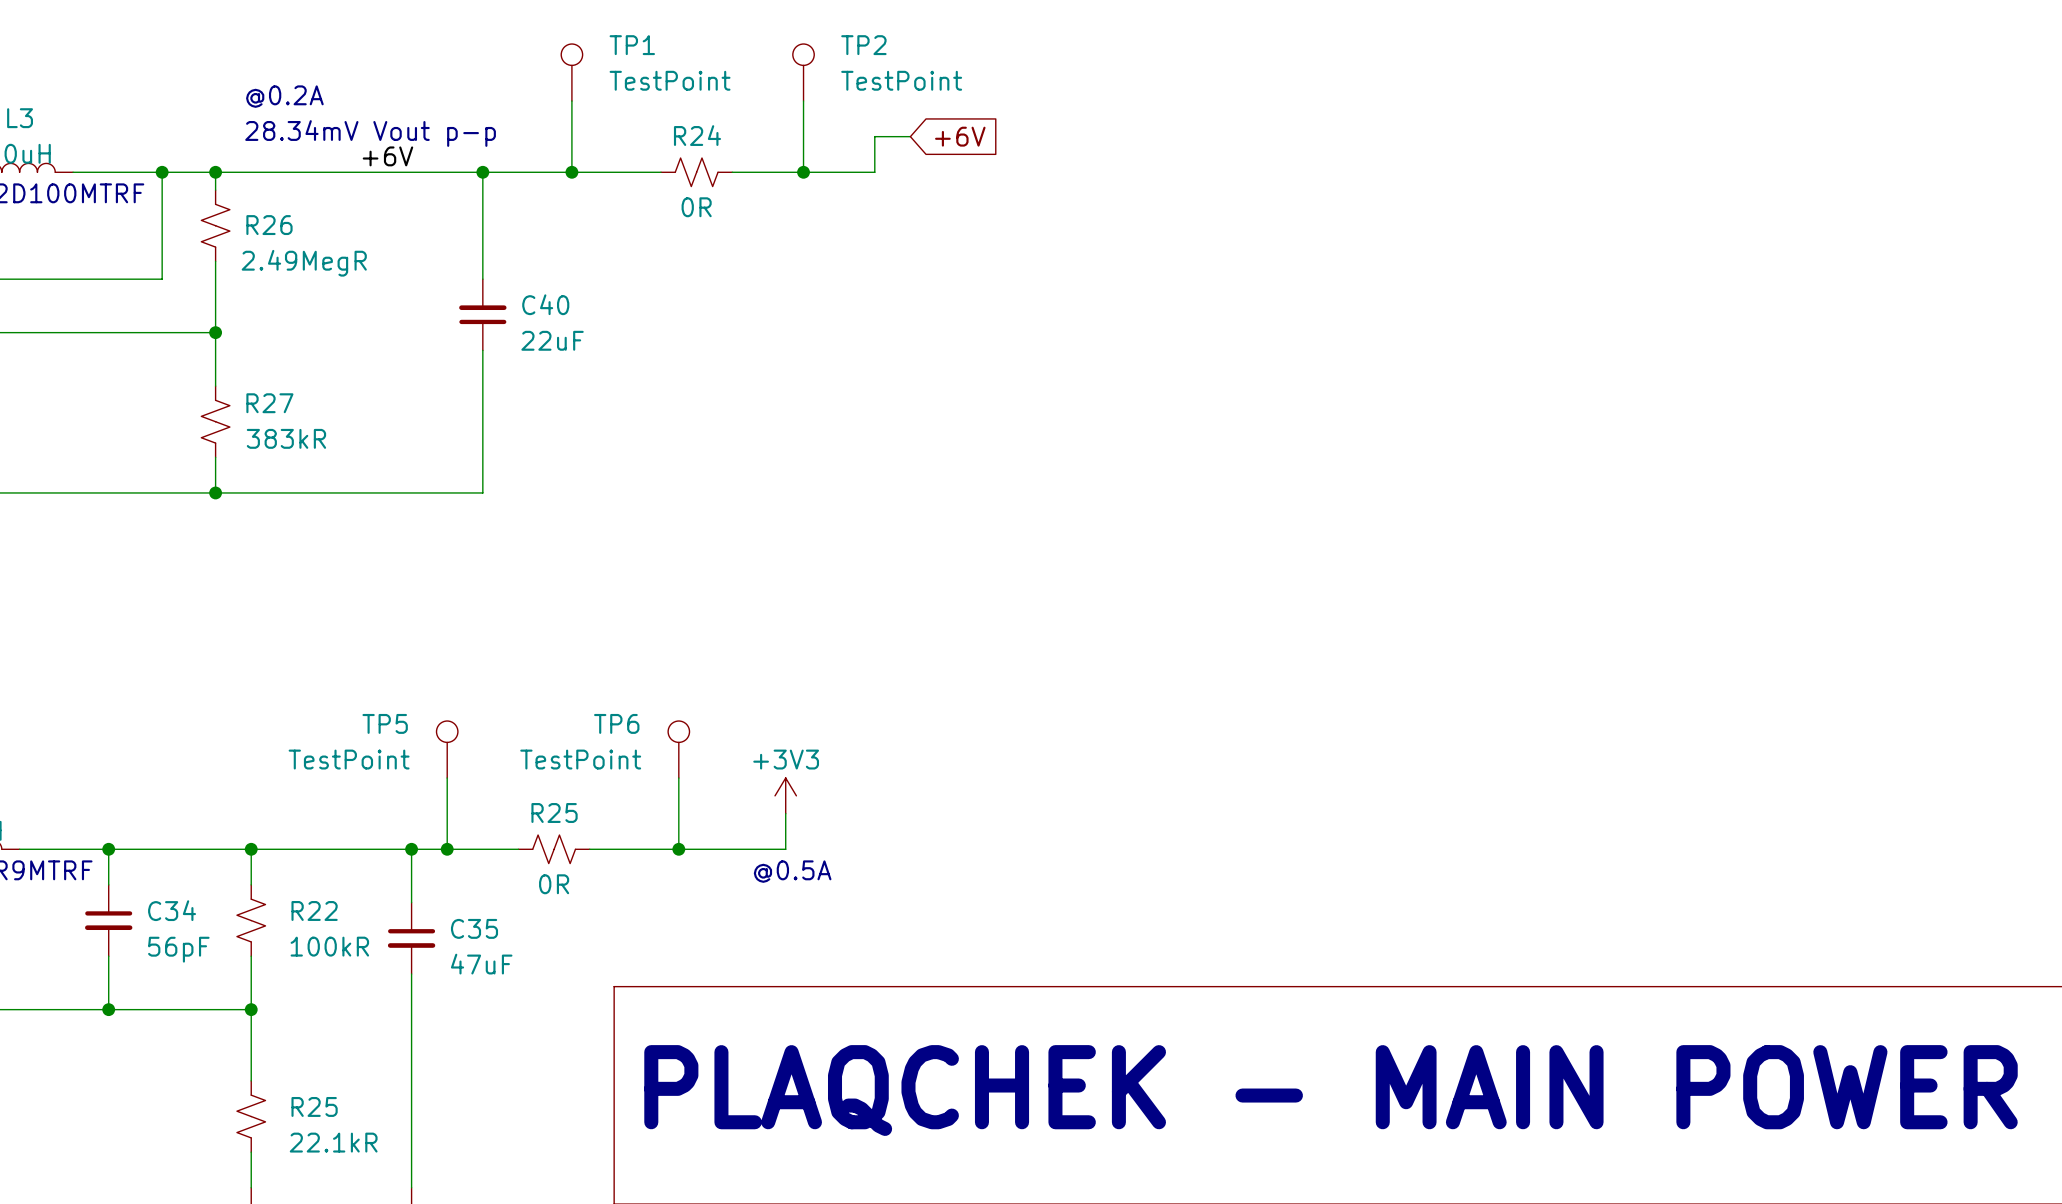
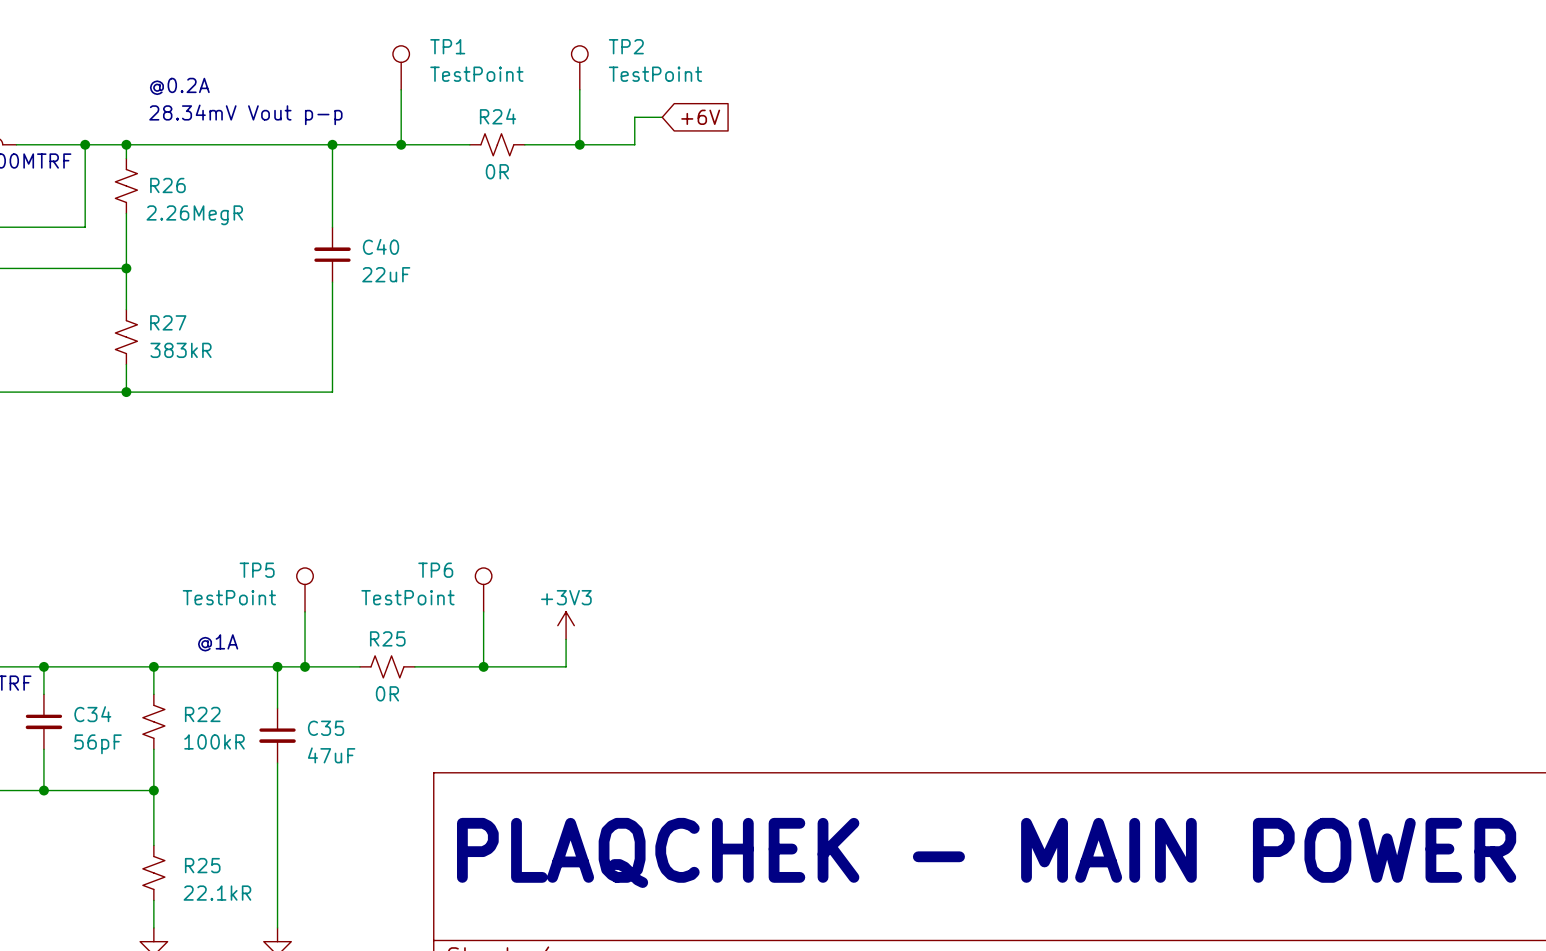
label: +6V (387, 156) -> none
R26 value: 2.49MegR (304, 263) -> 2.26MegR (194, 215)
text: none -> @1A (218, 642)
text: @0.5A (792, 871) -> none

